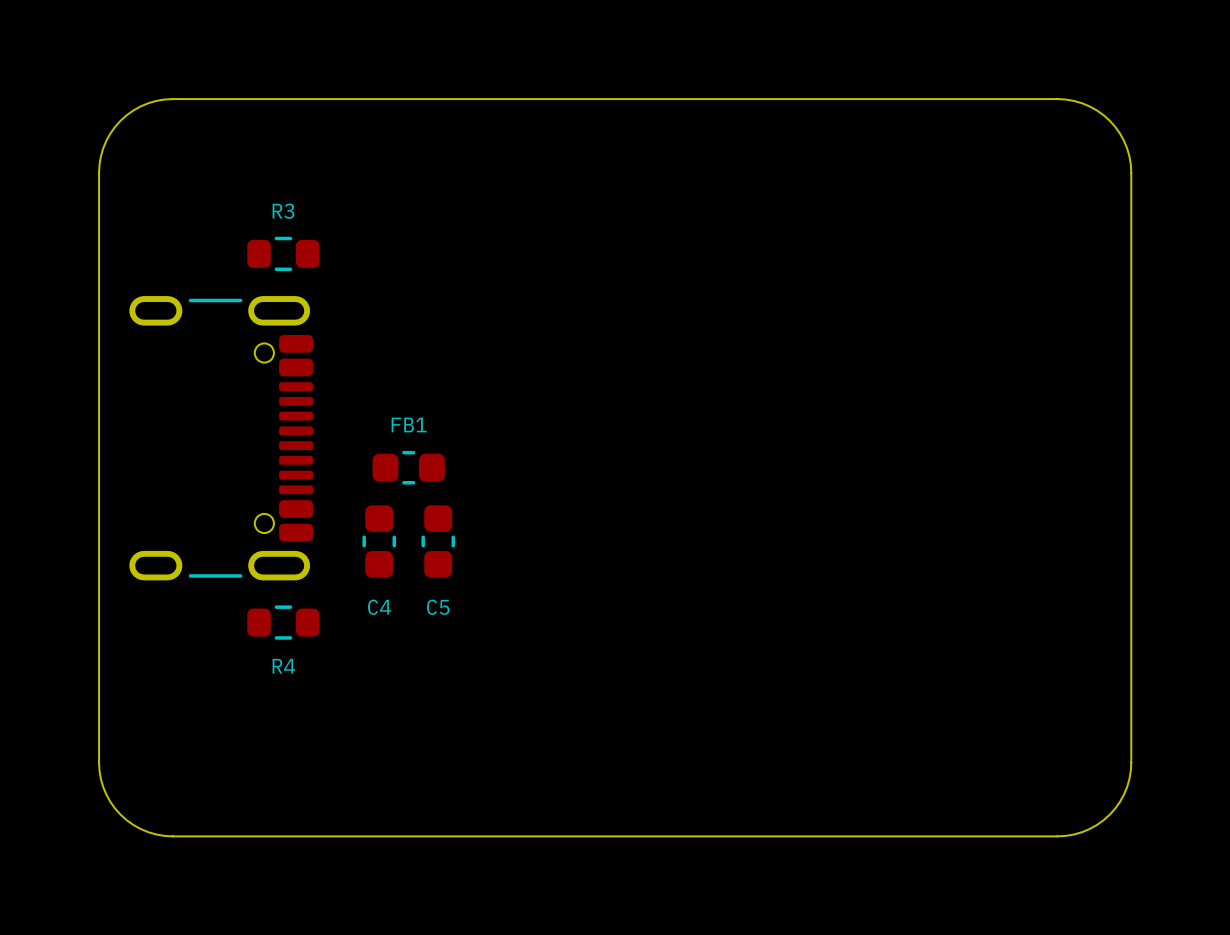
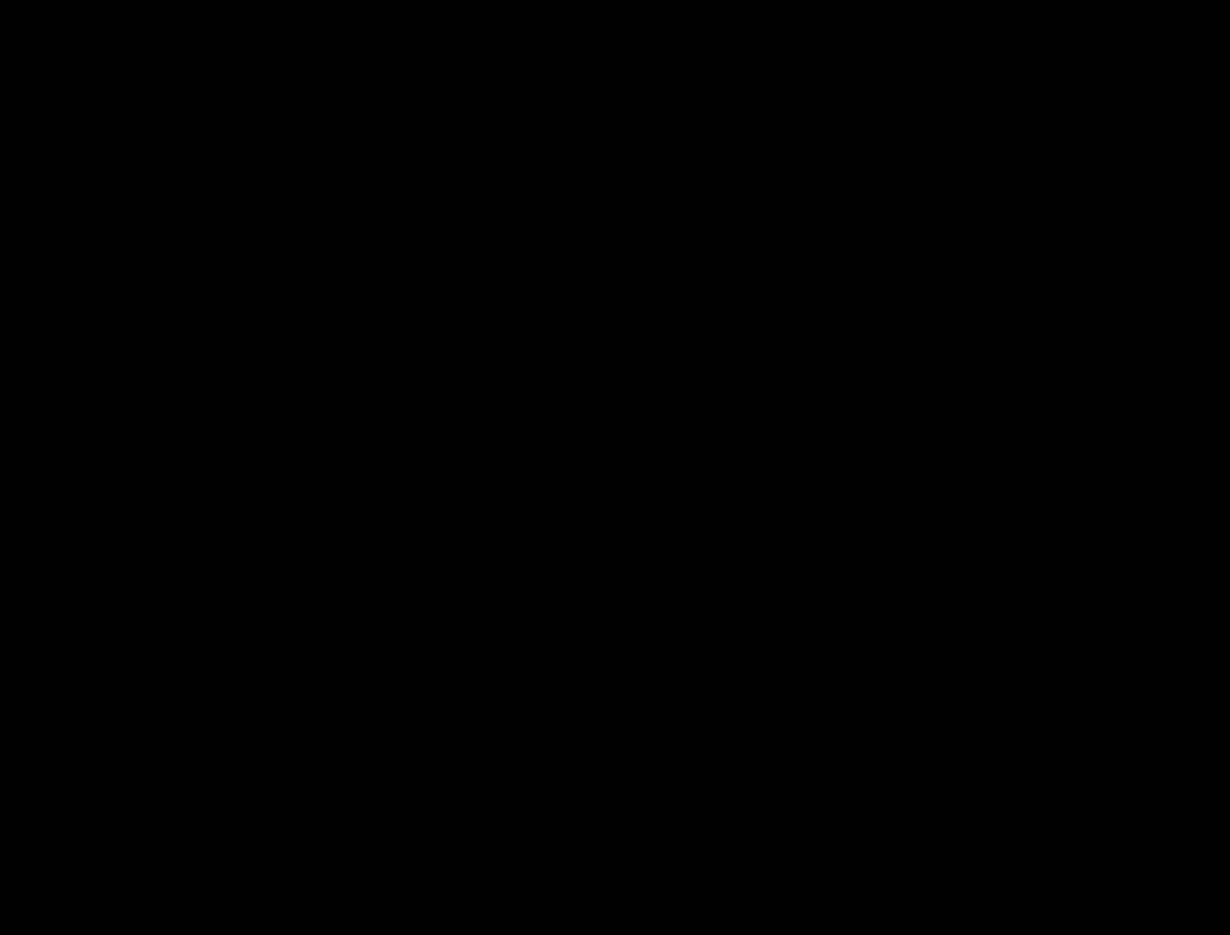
board edge: (172, 99) (1057, 99) (1081, 103) (1103, 115) (1115, 126) (1123, 140) (1129, 156) (1131, 172) (1131, 762) (1127, 786) (1115, 808) (1103, 820) (1089, 829) (1073, 834) (1057, 836) (172, 836) (148, 832) (126, 820) (115, 808) (106, 794) (100, 779) (99, 762) (99, 164) (106, 140) (120, 120) (140, 106) (156, 100) (172, 99) -> none
R3: (283, 253) -> none
part: (221, 438) -> none
FB1: (408, 467) -> none
C4: (379, 541) -> none
C5: (438, 541) -> none
R4: (283, 622) -> none

